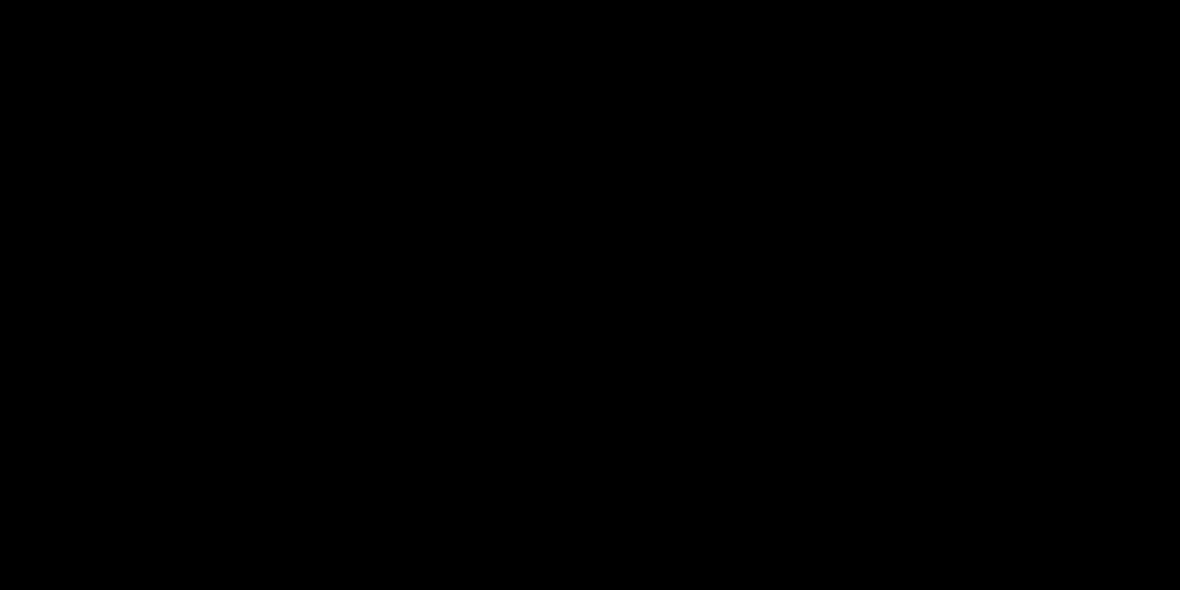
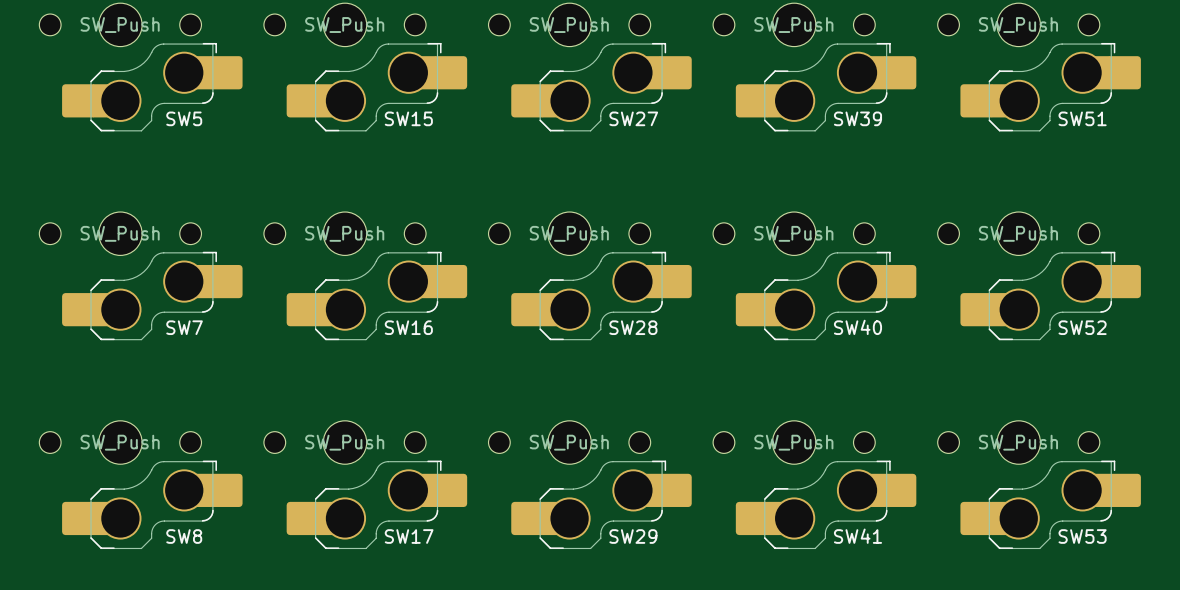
SW5: none -> SW_Push (140, 67)
SW15: none -> SW_Push (365, 67)
SW27: none -> SW_Push (590, 67)
SW39: none -> SW_Push (814, 67)
SW51: none -> SW_Push (1039, 67)
SW7: none -> SW_Push (140, 276)
SW16: none -> SW_Push (365, 276)
SW28: none -> SW_Push (590, 276)
SW40: none -> SW_Push (814, 276)
SW52: none -> SW_Push (1039, 276)
SW8: none -> SW_Push (140, 484)
SW17: none -> SW_Push (365, 484)
SW29: none -> SW_Push (590, 484)
SW41: none -> SW_Push (814, 484)
SW53: none -> SW_Push (1039, 484)

